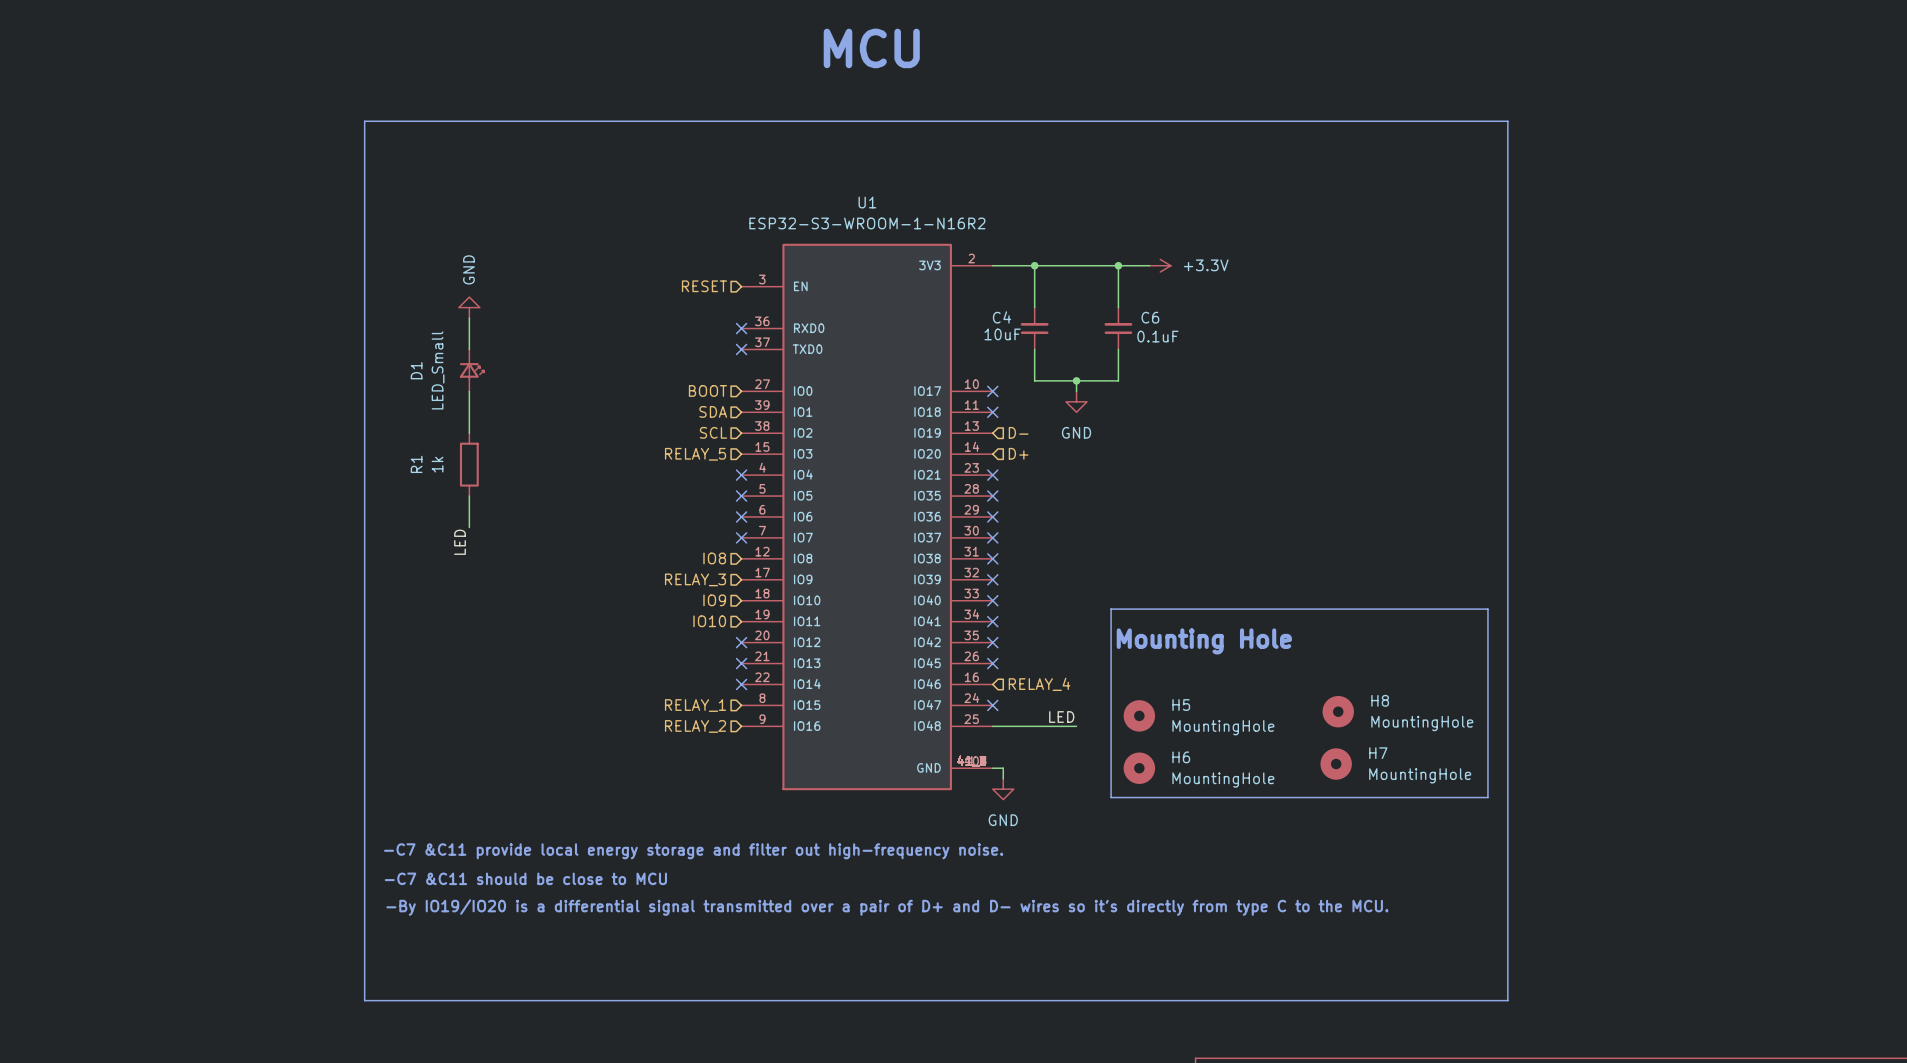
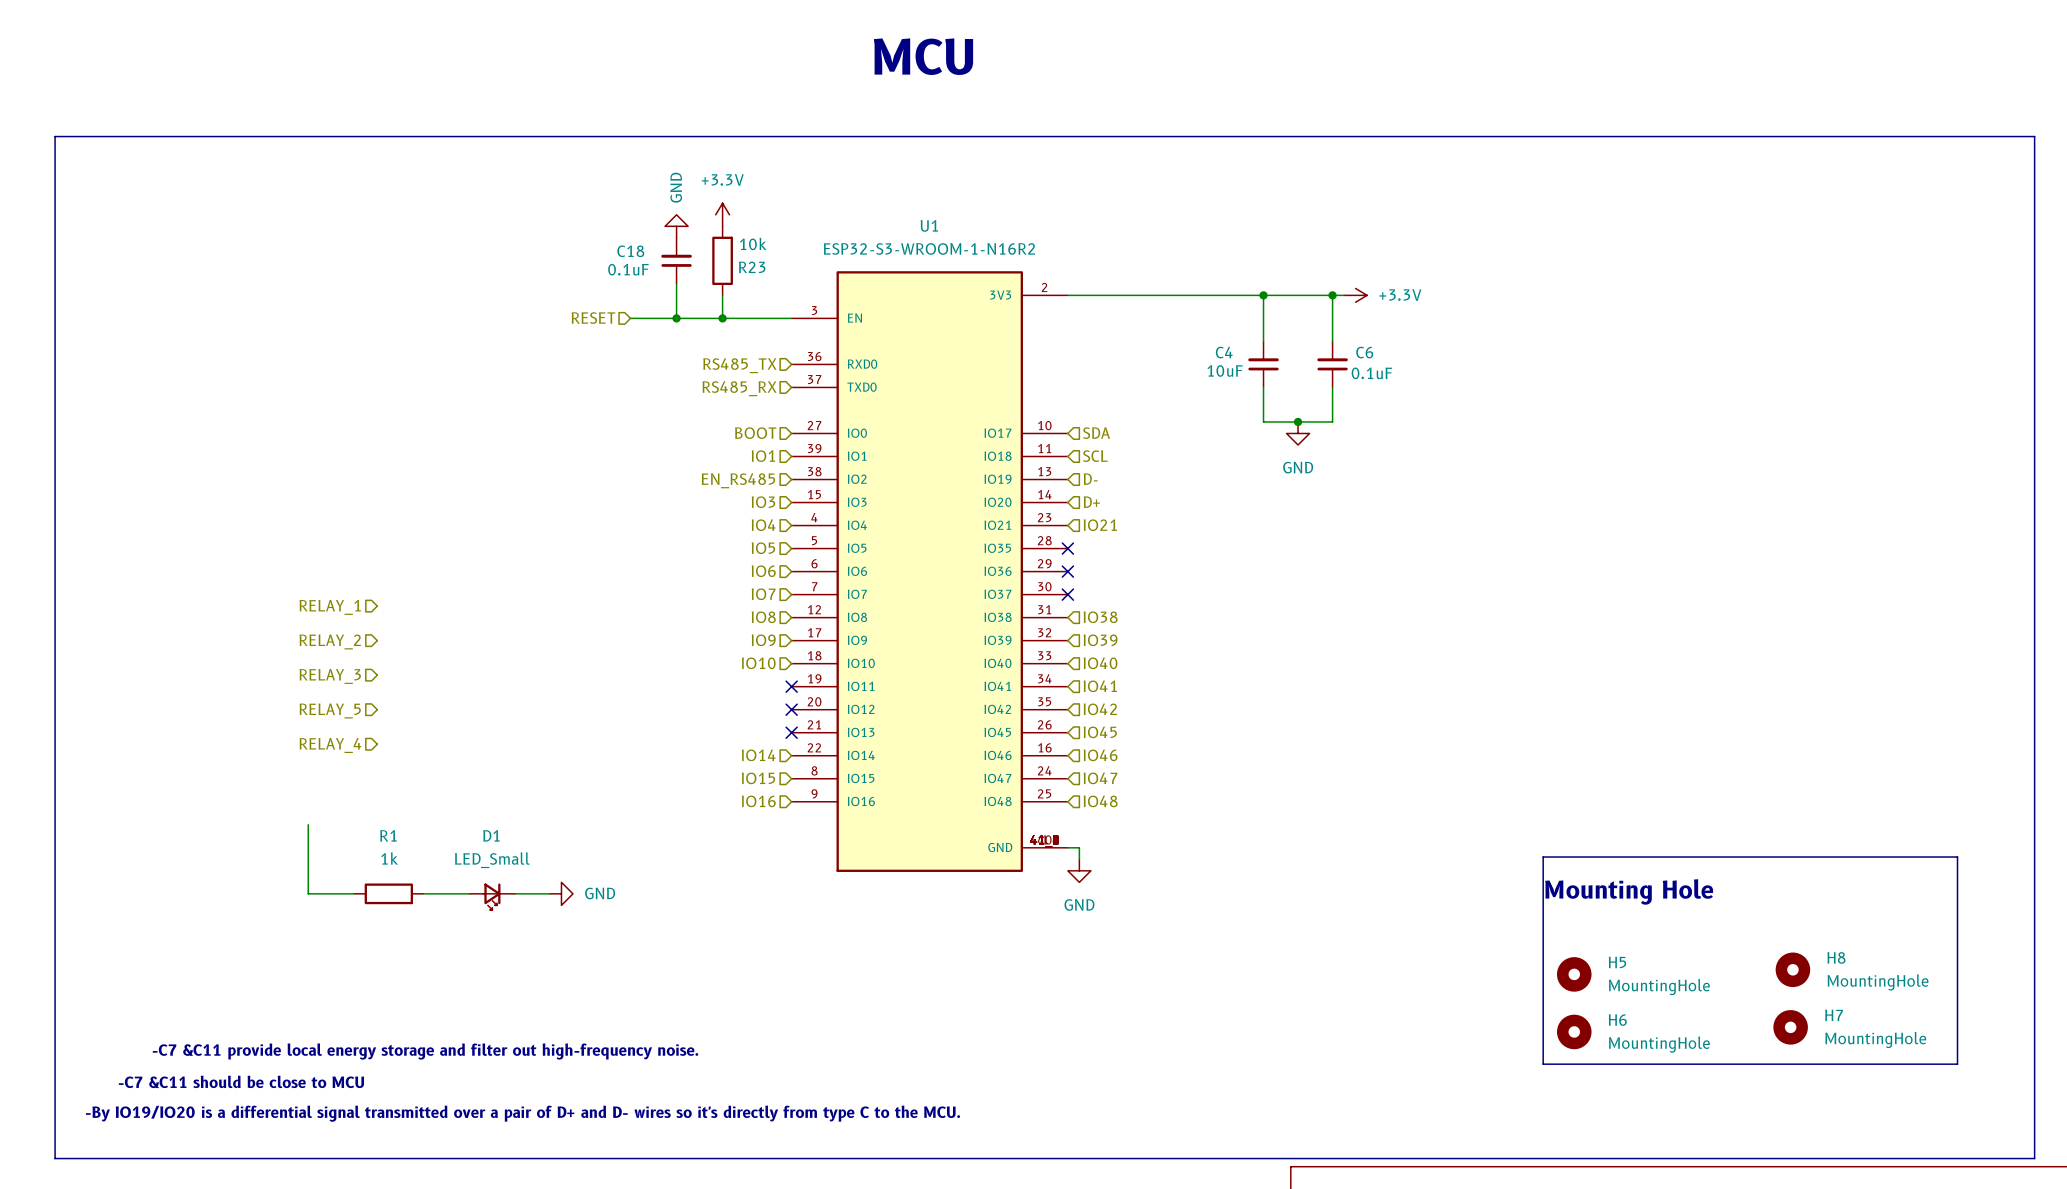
line: (364, 121) (364, 1000) (1507, 1000) (1507, 121) -> (377, 136) (55, 136) (55, 1158) (2034, 1158) (2034, 136) (1634, 136)
power symbol: none -> +3.3V (722, 214)
C18: none -> 0.1uF (676, 260)
R23: none -> 10k (722, 260)
wire: none -> (722, 295) (722, 318)
wire: (1034, 265) (1034, 307) -> (1332, 295) (1332, 341)
junction: (1034, 265) -> none
wire: (1118, 265) (1118, 307) -> (1263, 295) (1263, 341)
junction: (1118, 265) -> none
wire: none -> (1240, 295) (1344, 295)
power symbol position: +3.3V (1160, 265) -> +3.3V (1355, 295)
junction: none -> (1263, 295)
junction: none -> (1332, 295)
wire: none -> (630, 318) (791, 318)
junction: none -> (676, 318)
junction: none -> (722, 318)
hierarchical label position: RESET (704, 286) -> RESET (593, 318)
power symbol position: GND (469, 307) -> GND (676, 226)
wire: (469, 318) (469, 349) -> (676, 283) (676, 318)
hierarchical label: none -> RS485_TX (739, 365)
no-connect mark: (741, 328) -> none
C4 position: (1034, 328) -> (1263, 364)
C6 position: (1118, 328) -> (1332, 364)
hierarchical label: none -> RS485_RX (739, 388)
no-connect mark: (741, 349) -> none
wire: (1034, 349) (1034, 380) (1118, 380) (1118, 349) -> none
wire: none -> (1263, 387) (1263, 421) (1332, 421) (1332, 387)
D1 rotation: 0° (471, 370) -> 90° clockwise (491, 896)
D1 position: (471, 370) -> (492, 896)
wire: (1076, 380) (1076, 391) -> none
junction: (1076, 380) -> none
junction: none -> (1298, 421)
hierarchical label: none -> SDA (1096, 433)
wire: (469, 391) (469, 433) -> none
no-connect mark: (992, 391) -> none
power symbol position: GND (1076, 401) -> GND (1298, 433)
hierarchical label: SDA (713, 411) -> IO1 (763, 456)
hierarchical label: none -> SCL (1095, 456)
no-connect mark: (992, 412) -> none
hierarchical label: SCL (713, 432) -> EN_RS485 (738, 480)
hierarchical label: RELAY_5 (695, 454) -> IO3 (763, 502)
R1 rotation: 0° (469, 464) -> 90° clockwise (388, 893)
R1 position: (469, 464) -> (388, 893)
hierarchical label: none -> IO4 (763, 525)
hierarchical label: none -> IO21 (1100, 525)
no-connect mark: (741, 475) -> none
no-connect mark: (992, 475) -> none
hierarchical label: none -> IO5 (763, 548)
wire: (469, 496) (469, 527) -> none
no-connect mark: (741, 496) -> none
hierarchical label: none -> IO6 (763, 571)
no-connect mark: (741, 516) -> none
hierarchical label: none -> IO7 (763, 594)
no-connect mark: (741, 537) -> none
label: LED (460, 542) -> none
hierarchical label: none -> RELAY_1 (330, 607)
no-connect mark: (992, 558) -> none
hierarchical label: none -> IO38 (1100, 617)
hierarchical label: none -> RELAY_2 (330, 641)
hierarchical label: RELAY_3 (695, 579) -> IO9 (763, 640)
no-connect mark: (992, 579) -> none
hierarchical label: none -> IO39 (1100, 640)
hierarchical label: IO9 (714, 600) -> IO10 (758, 663)
no-connect mark: (992, 600) -> none
hierarchical label: none -> IO40 (1100, 663)
line: (1111, 609) (1487, 609) (1487, 797) (1111, 797) (1111, 609) -> none
hierarchical label: none -> RELAY_3 (330, 676)
hierarchical label: IO10 (709, 621) -> none
no-connect mark: none -> (791, 686)
no-connect mark: (992, 621) -> none
hierarchical label: none -> IO41 (1100, 686)
hierarchical label: none -> IO42 (1100, 709)
text: Mounting Hole (1204, 641) -> none
hierarchical label: none -> RELAY_5 (330, 710)
no-connect mark: (992, 642) -> none
hierarchical label: none -> IO45 (1100, 732)
no-connect mark: (992, 663) -> none
hierarchical label: none -> RELAY_4 (330, 745)
hierarchical label: none -> IO14 (758, 755)
no-connect mark: (741, 684) -> none
hierarchical label: RELAY_4 (1039, 684) -> IO46 (1100, 755)
hierarchical label: none -> IO47 (1100, 778)
hierarchical label: RELAY_1 (695, 705) -> IO15 (758, 778)
no-connect mark: (992, 705) -> none
H8 position: (1338, 711) -> (1792, 969)
H5 position: (1139, 715) -> (1574, 974)
label: LED (1061, 717) -> none
hierarchical label: none -> IO48 (1100, 801)
hierarchical label: RELAY_2 (695, 726) -> IO16 (758, 801)
wire: (992, 726) (1076, 726) -> none
wire: none -> (308, 824) (308, 893) (354, 893)
H7 position: (1336, 764) -> (1790, 1027)
H6 position: (1139, 768) -> (1574, 1031)
line: none -> (1543, 857) (1957, 857) (1957, 1064) (1543, 1064) (1543, 857)
text: none -> Mounting Hole (1629, 891)
wire: none -> (423, 893) (469, 893)
wire: none -> (515, 893) (549, 893)
power symbol: none -> GND (561, 893)
text: -C7 &C11 provide local energy storage and filter out high-frequency noise. (693, 851) -> none
text: -C7 &C11 should be close to MCU (525, 878) -> none
text: -By IO19/IO20 is a differential signal transmitted over a pair of D+ and D- wires so it's directly from type C to the MCU. (887, 907) -> none
text: none -> -C7 &C11 provide local energy storage and filter out high-frequency noise. (425, 1051)
text: none -> -C7 &C11 should be close to MCU (241, 1081)
text: none -> -By IO19/IO20 is a differential signal transmitted over a pair of D+ and D- wires so it's directly from type C to the MCU. (522, 1113)

